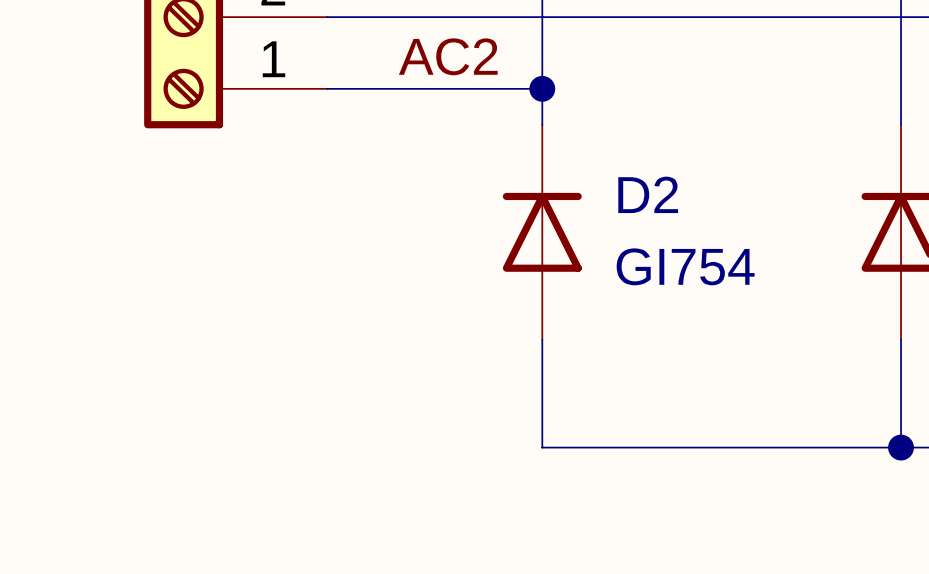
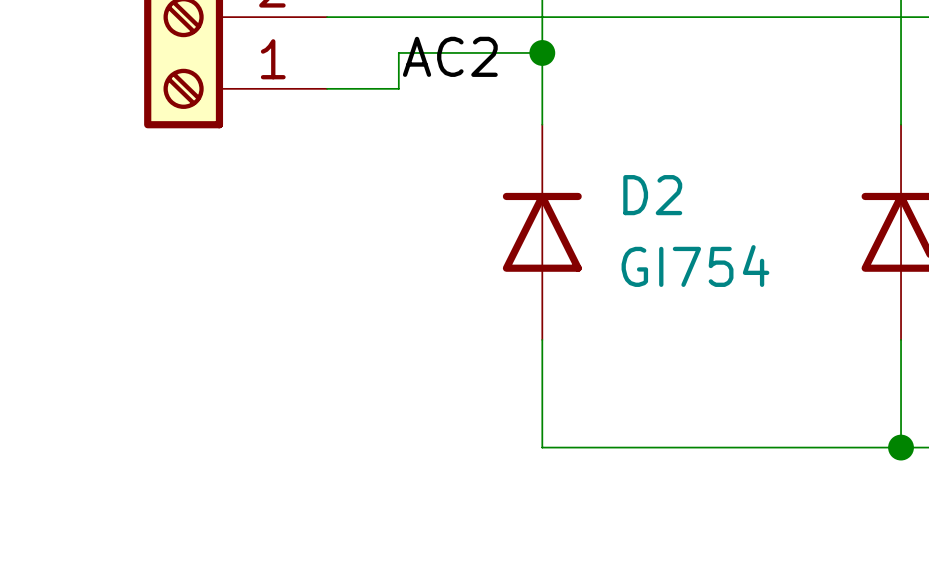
wire: (398, 88) (542, 88) -> (398, 88) (398, 52) (542, 52)
junction position: (542, 88) -> (542, 52)

